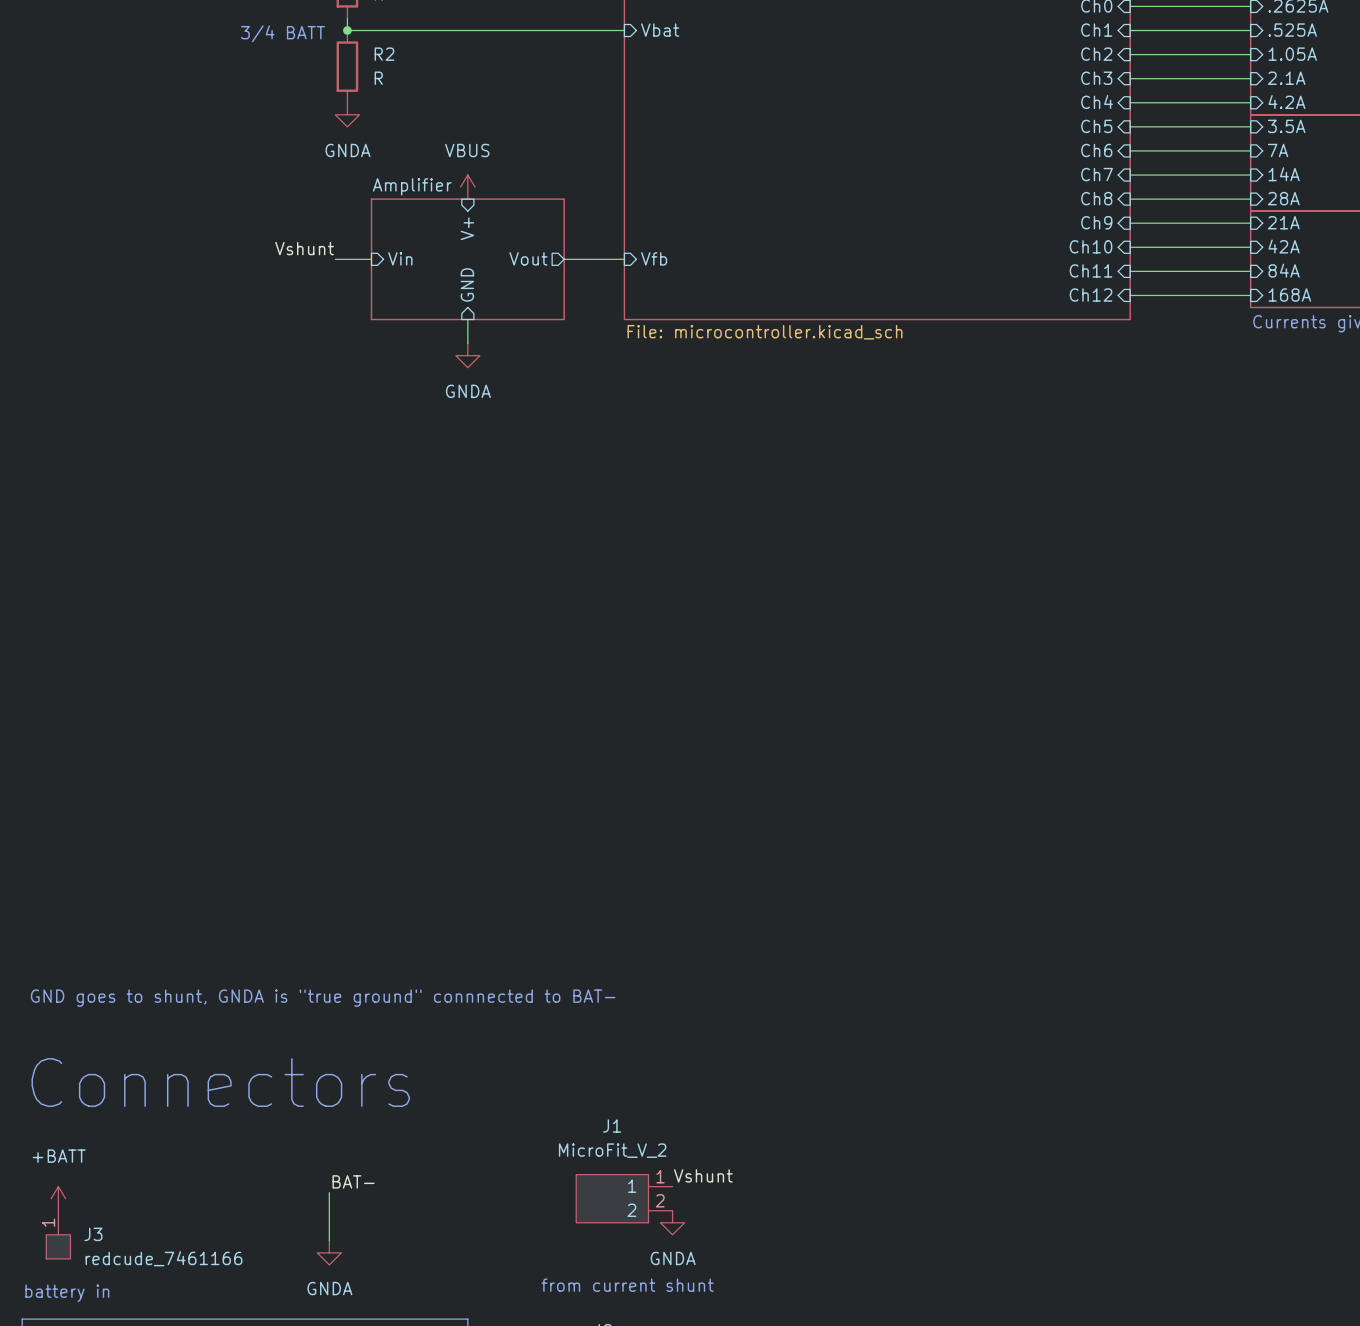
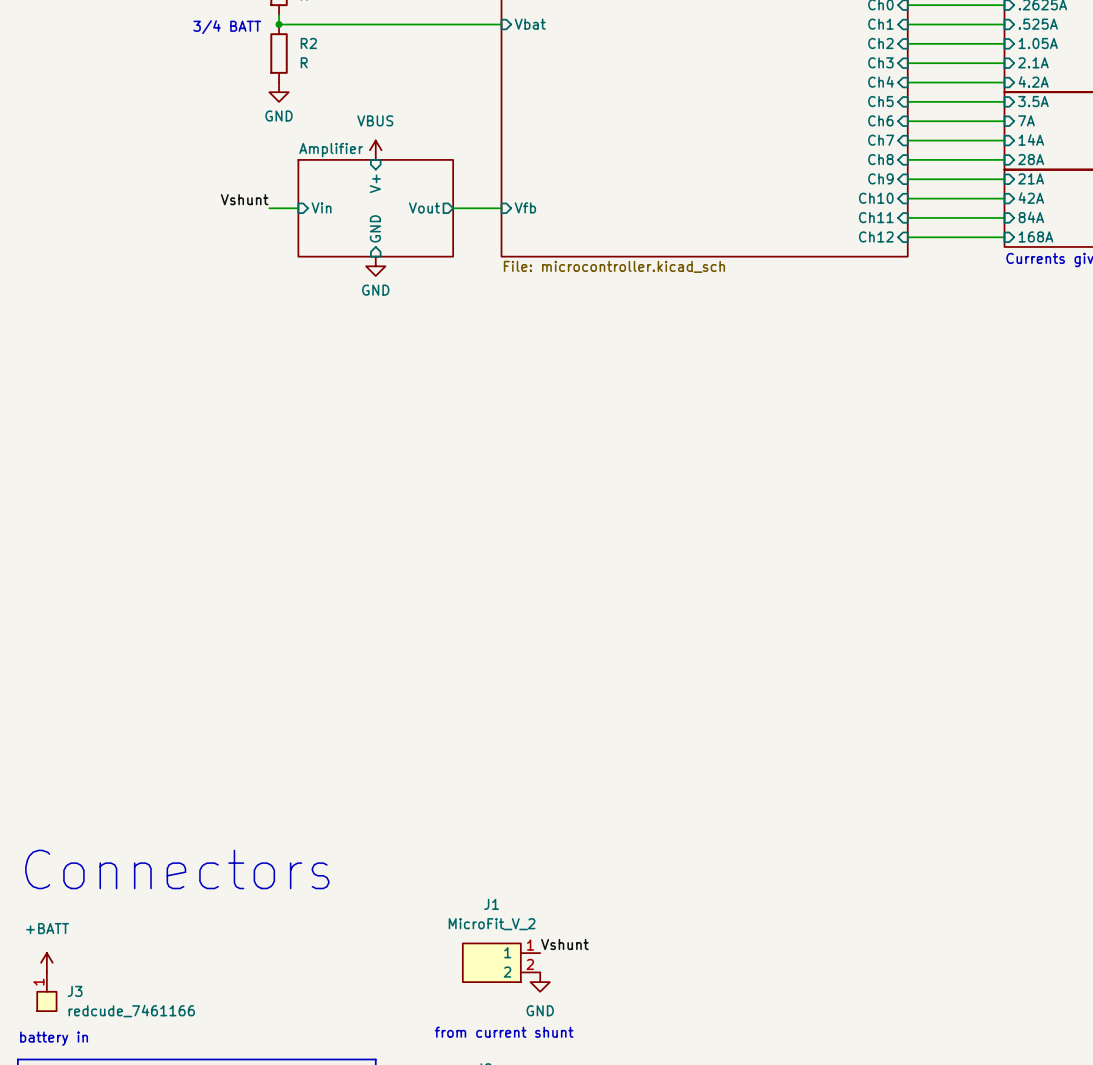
power symbol: GNDA (347, 114) -> GND (279, 92)
power symbol: none -> GND (375, 266)
power symbol: GNDA (467, 355) -> none
text: GND goes to shunt, GNDA is "true ground" connnected to BAT- (323, 998) -> none
label: BAT- (353, 1181) -> none
wire: (329, 1192) (329, 1240) -> none
power symbol: GNDA (672, 1222) -> GND (540, 982)
power symbol: GNDA (329, 1252) -> none

